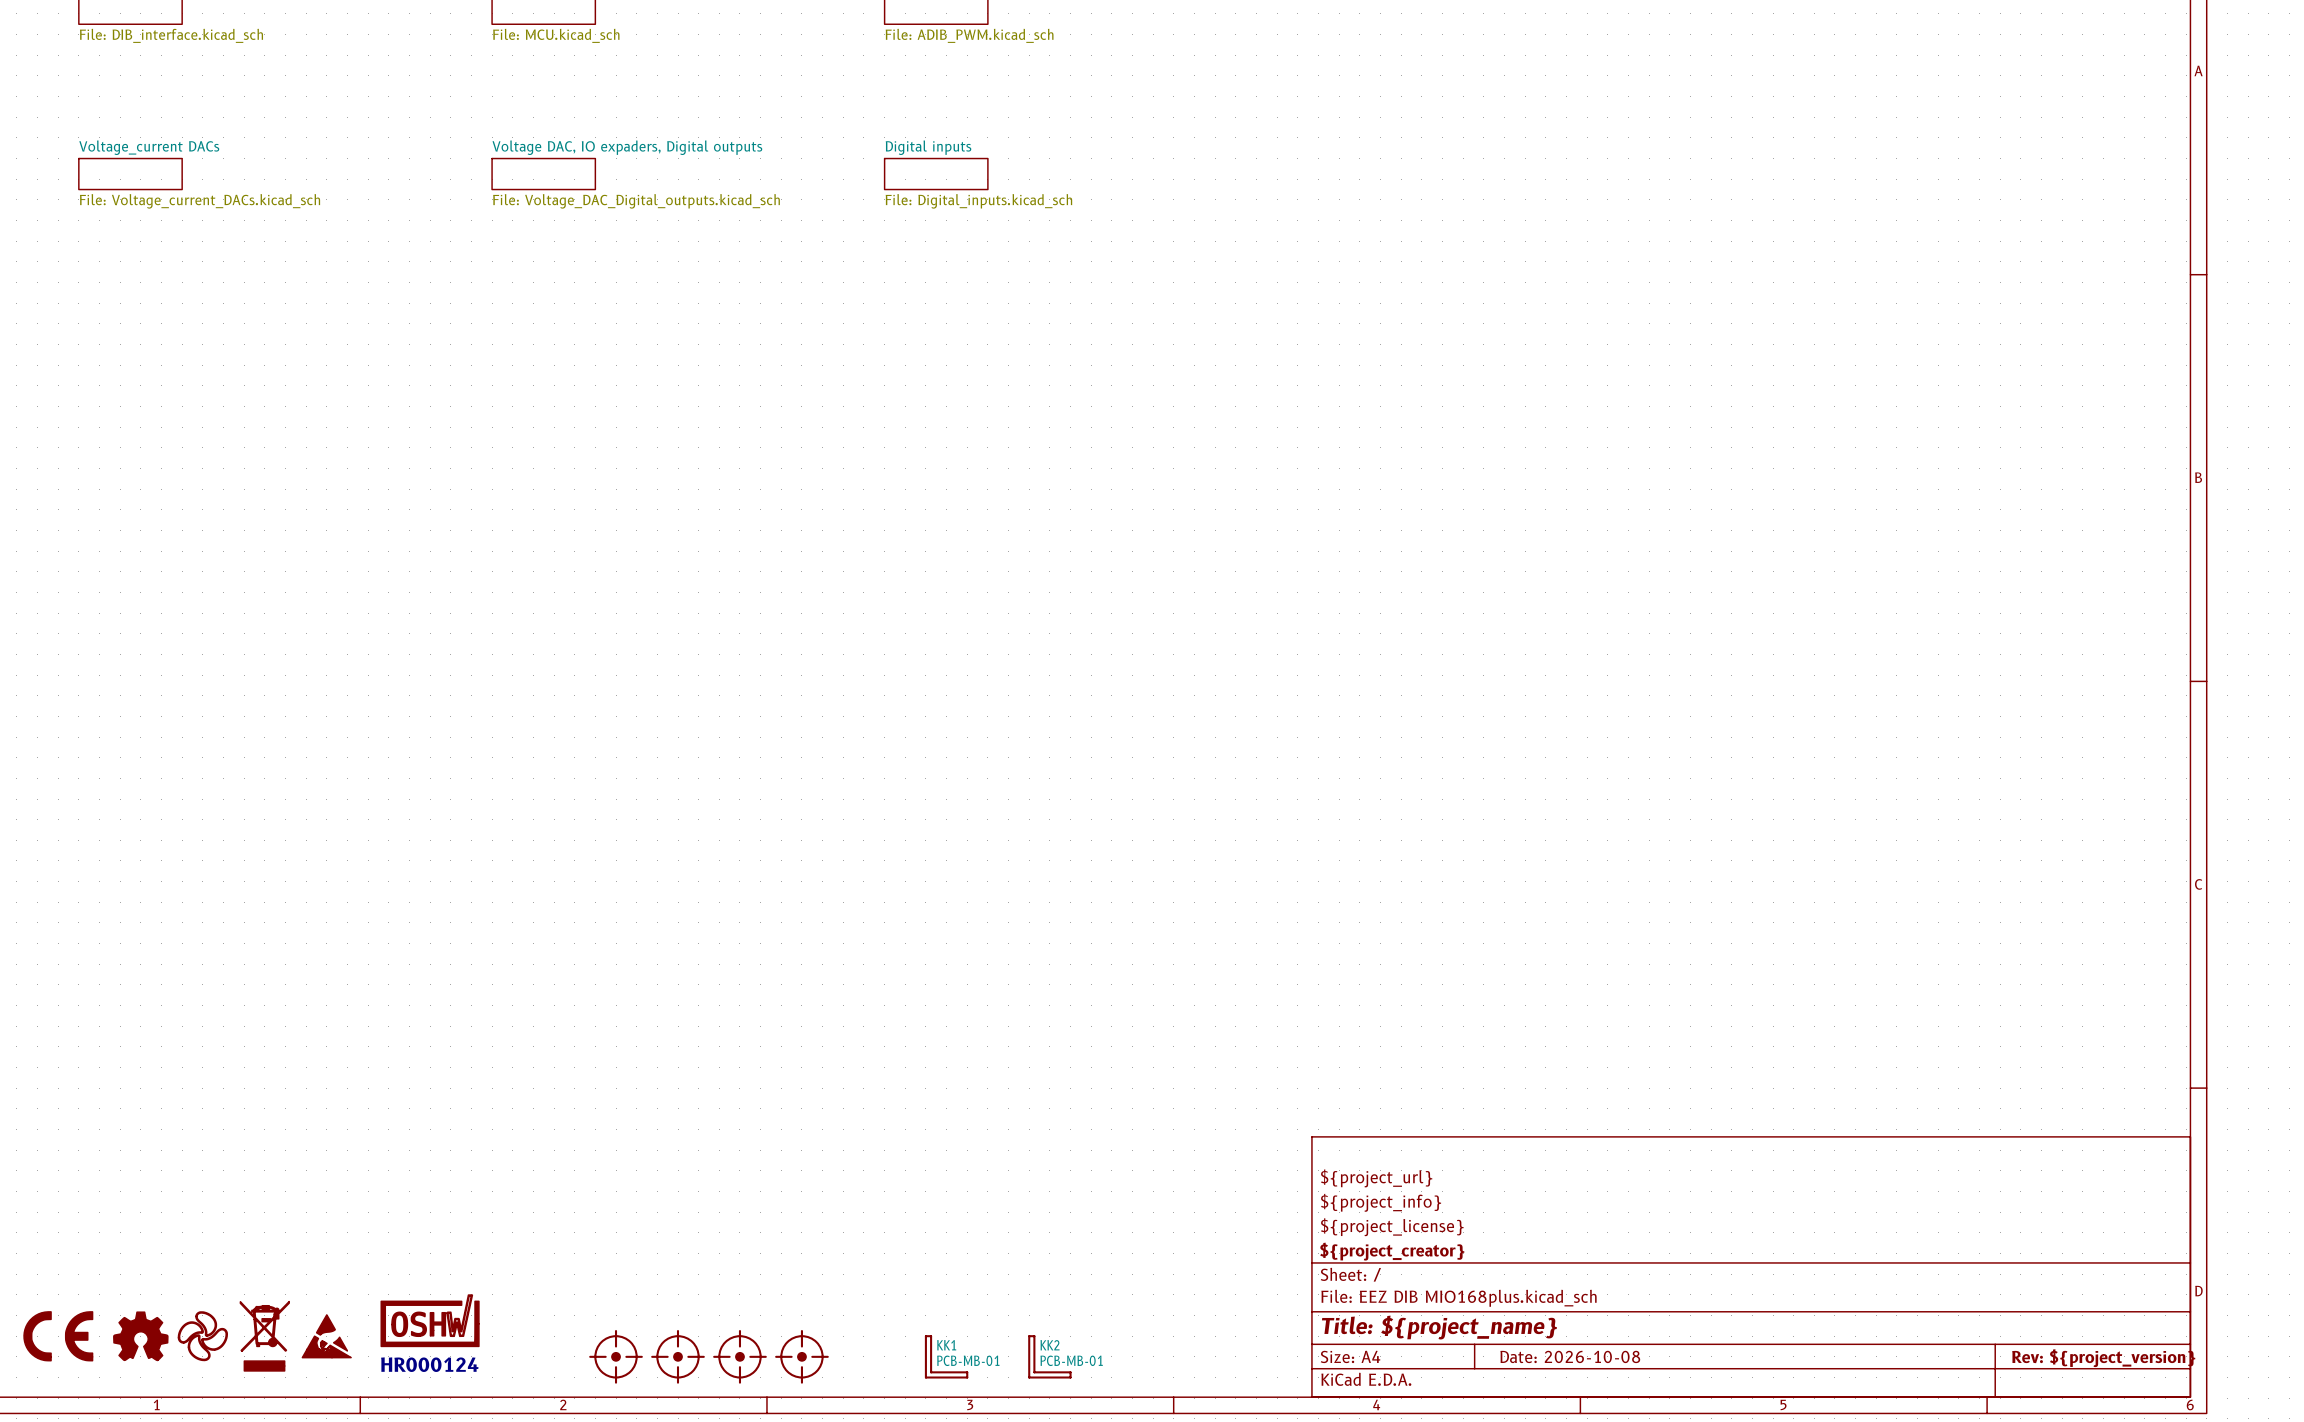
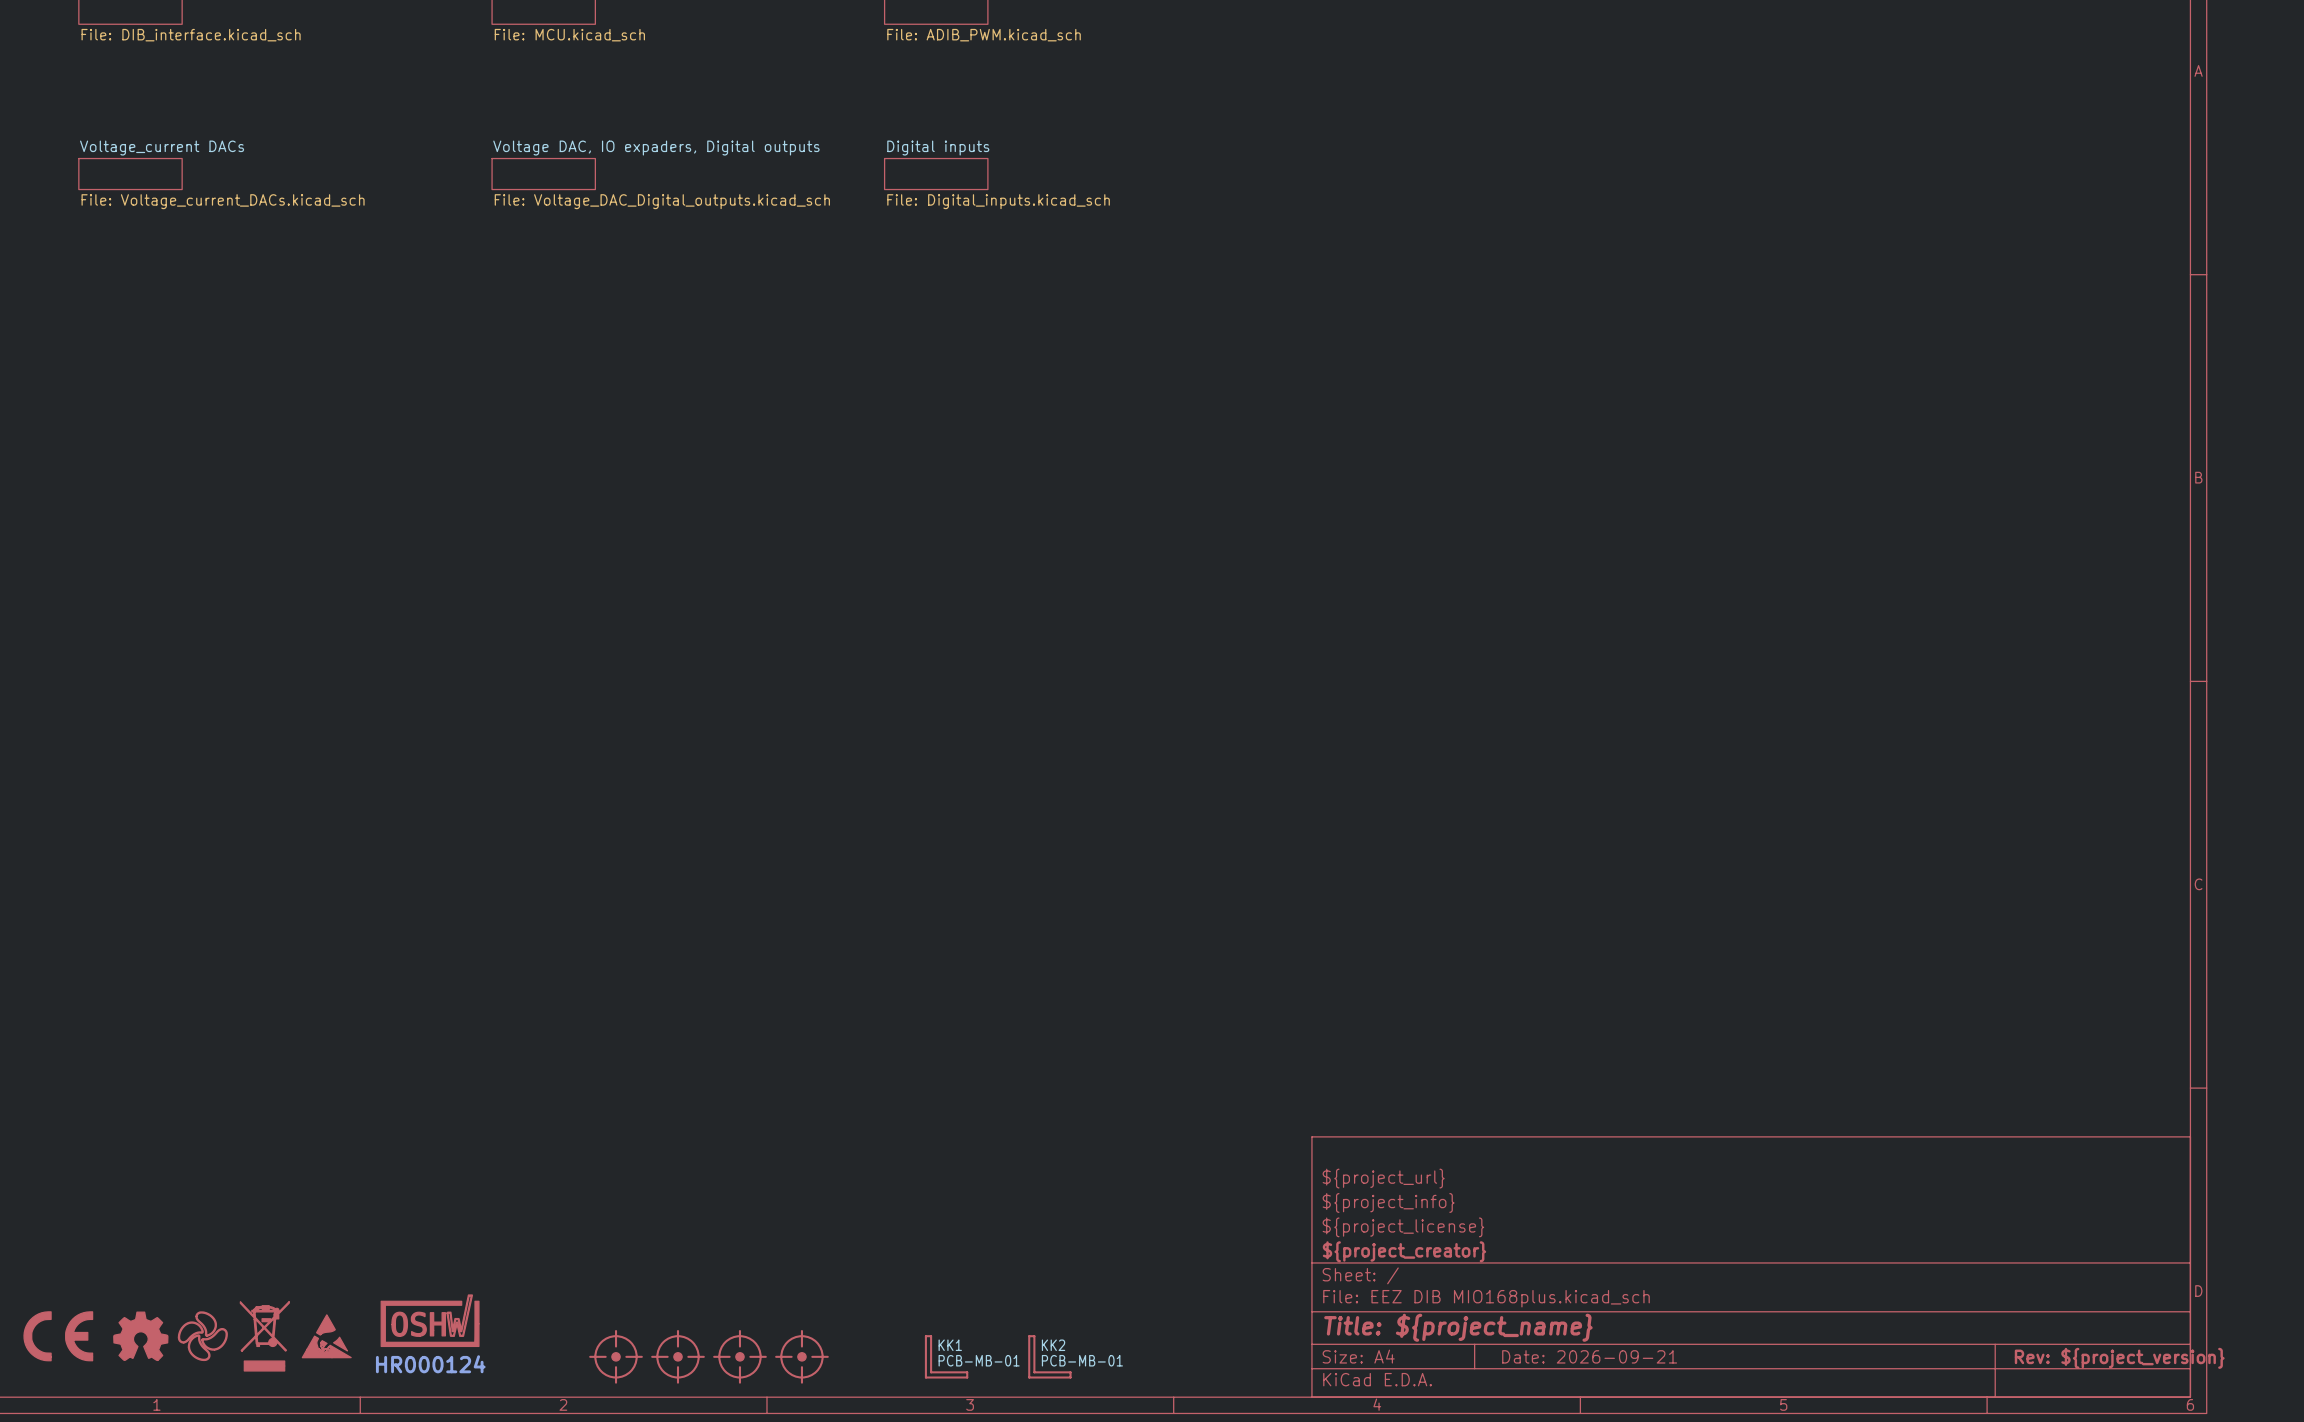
title block: Date: 2026-10-08 (1570, 1356) -> Date: 2026-09-21 (1589, 1356)

